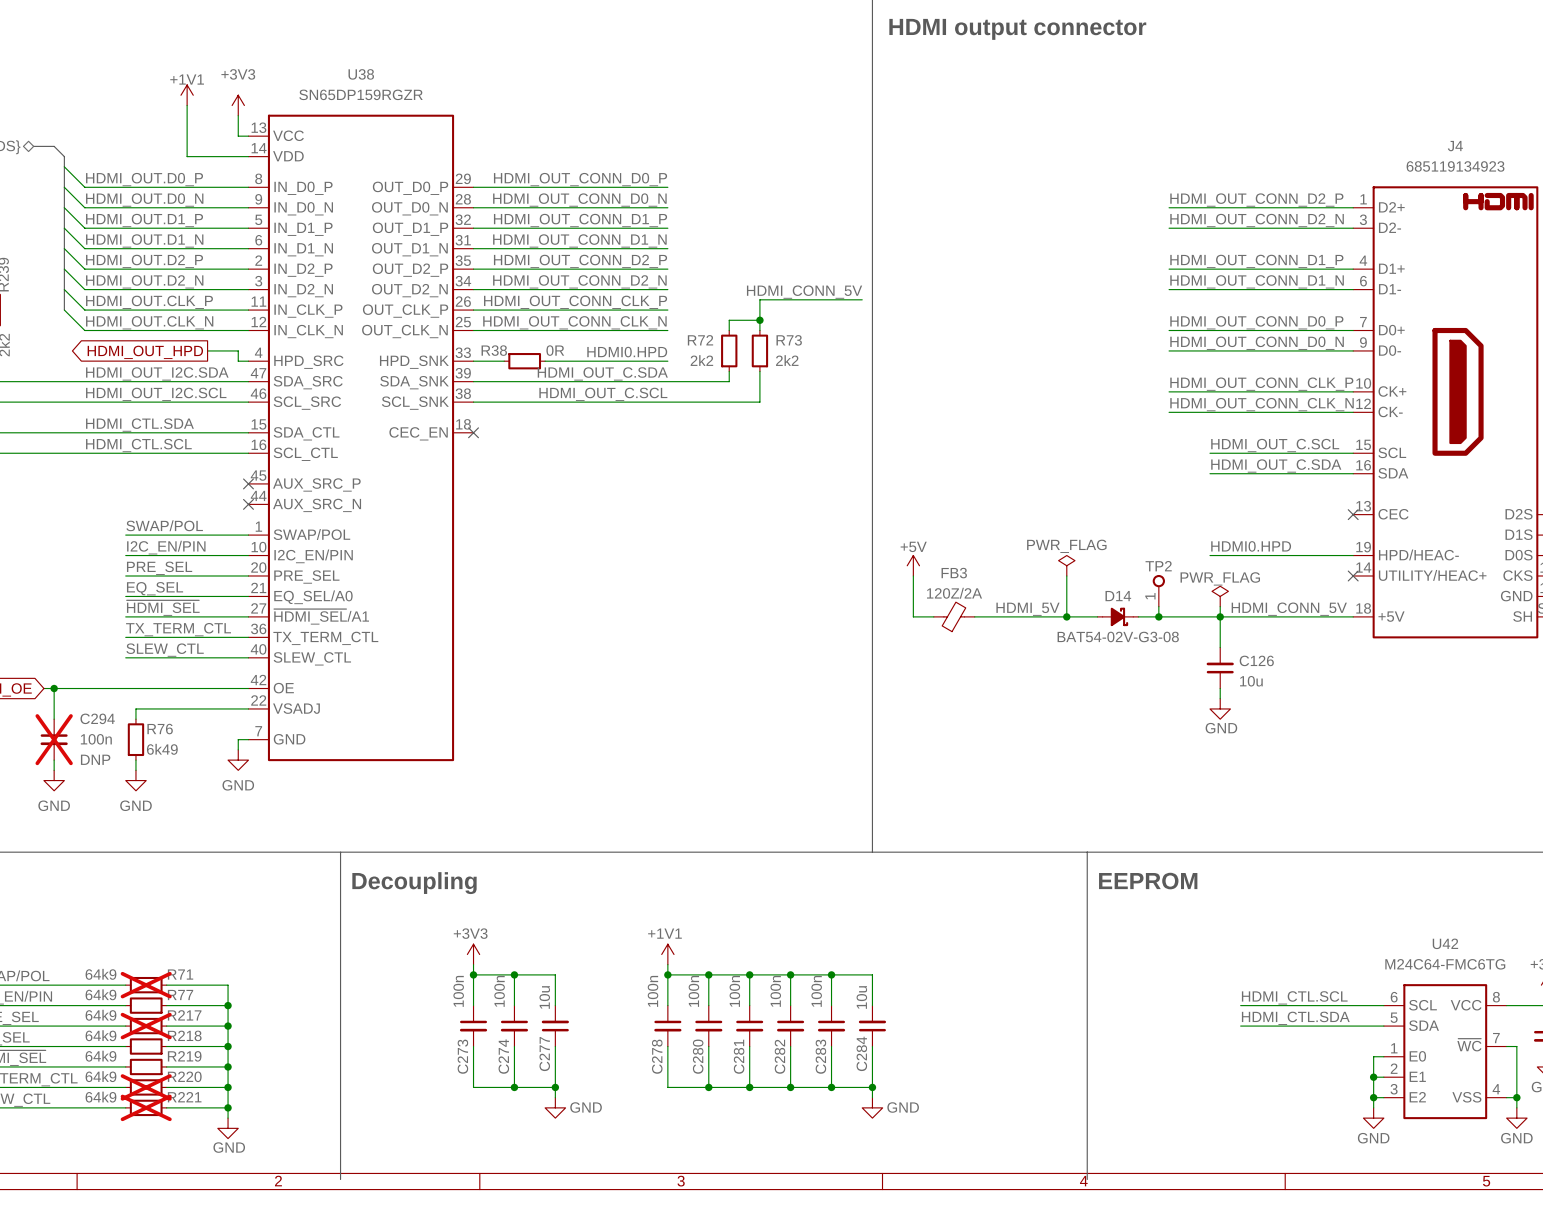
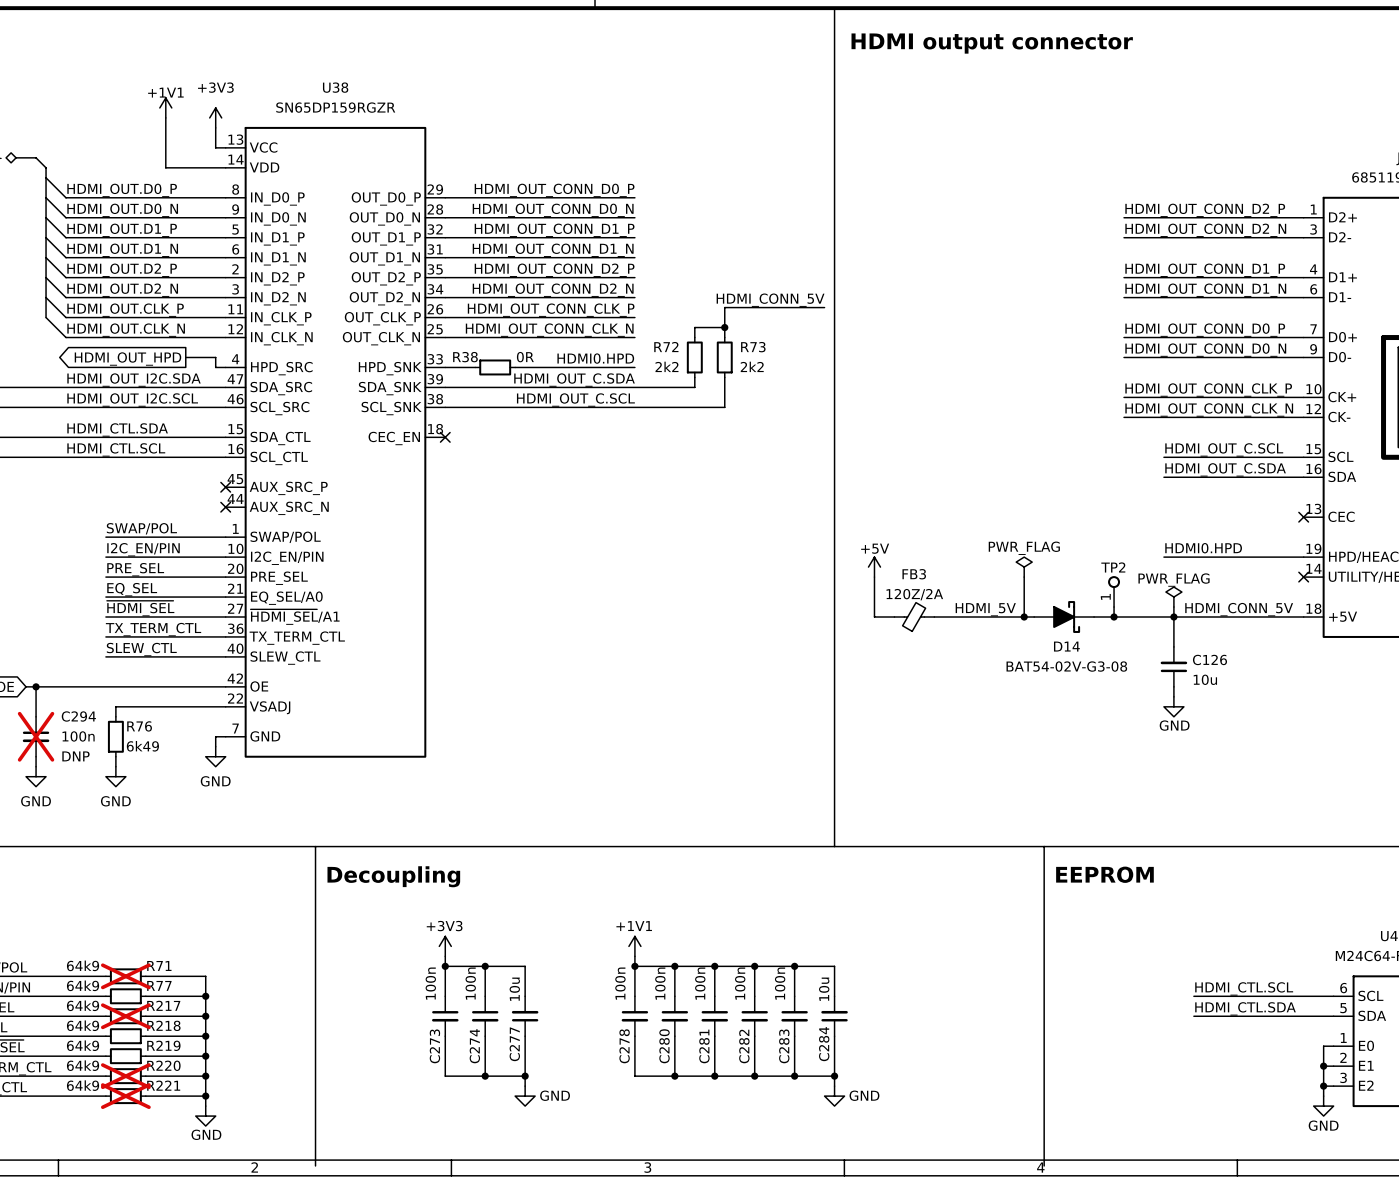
D14 name position: D14 (1118, 596) -> D14 (1066, 646)
D14 symbol: [1097, 607, 1139, 627] -> [1034, 601, 1095, 633]
D14 text position: BAT54-02V-G3-08 (1118, 636) -> BAT54-02V-G3-08 (1066, 666)

